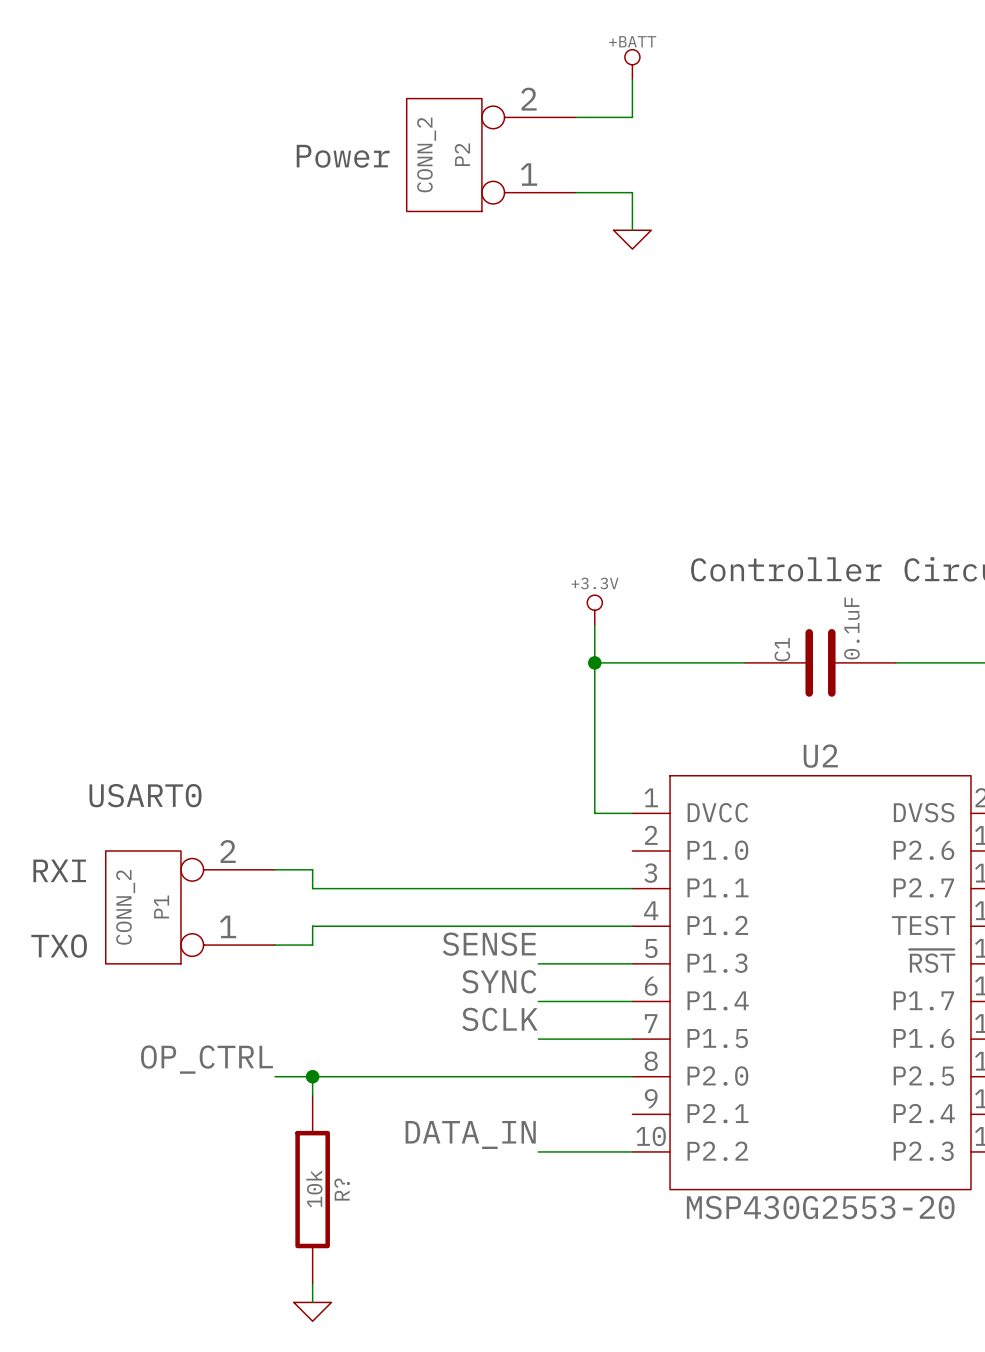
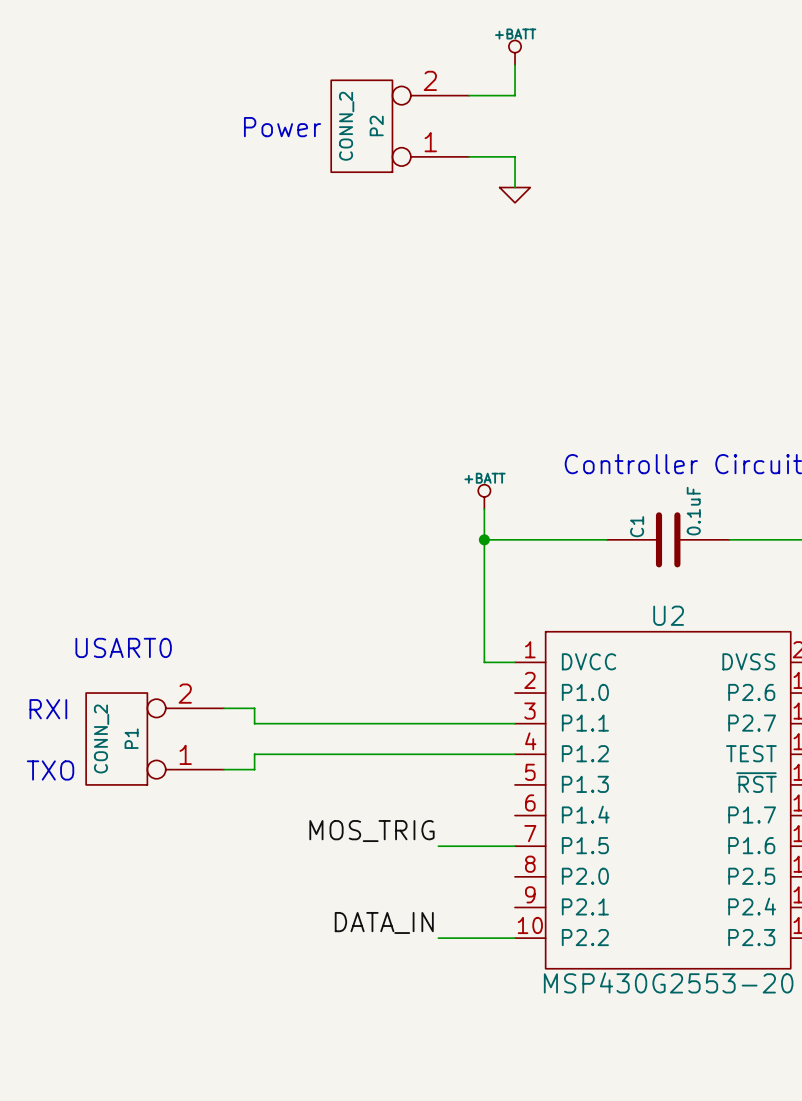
power symbol: +3.3V (594, 610) -> +BATT (484, 496)
label: SENSE (489, 944) -> none
wire: (538, 963) (632, 963) -> none
label: SYNC (499, 981) -> none
wire: (538, 1001) (632, 1001) -> none
label: SCLK (499, 1019) -> MOS_TRIG (372, 831)
label: OP_CTRL (206, 1059) -> none
wire: (275, 1076) (632, 1076) -> none
wire: (312, 1076) (312, 1095) -> none
junction: (312, 1076) -> none
R?: 10k (312, 1189) -> none
wire: (312, 1283) (312, 1302) -> none
power symbol: (312, 1311) -> none

